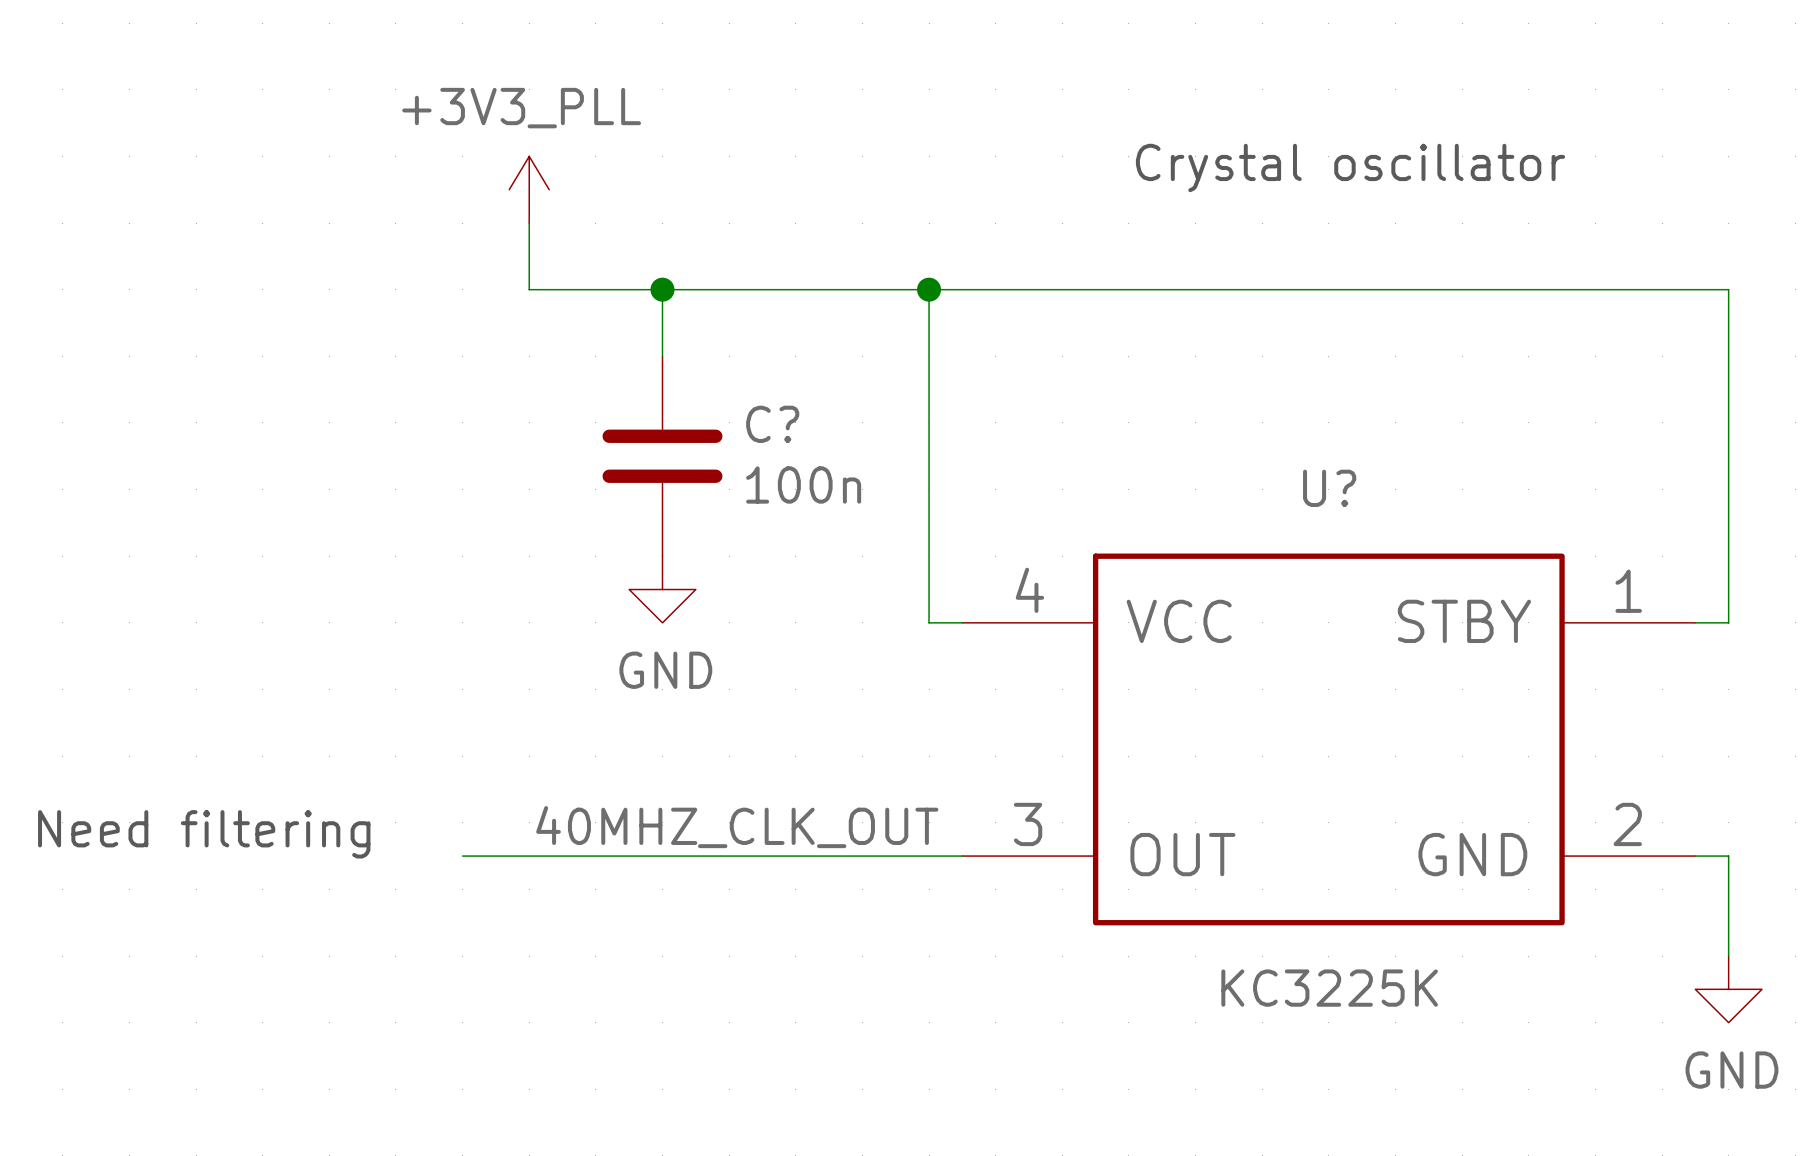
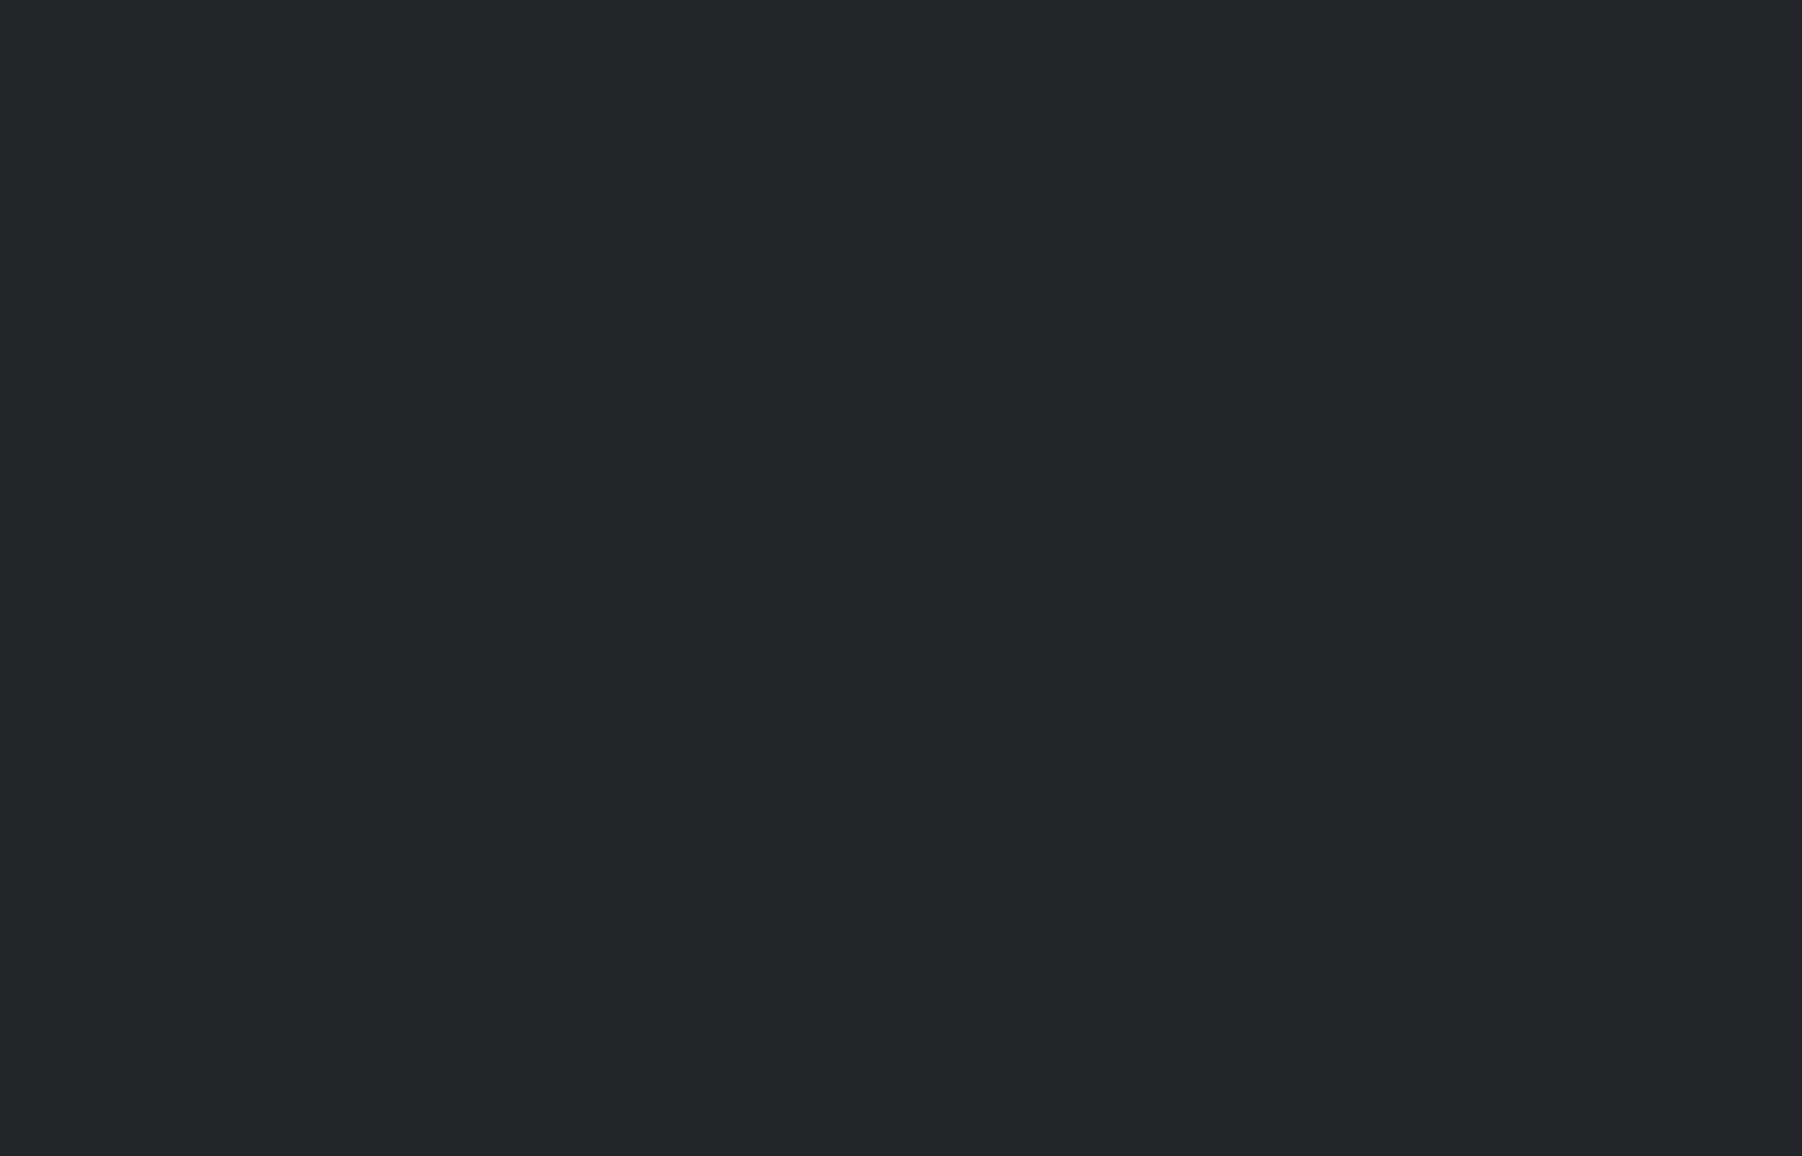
text: Crystal oscillator (1350, 167) -> none
power symbol: +3V3_PLL (529, 189) -> none
wire: (529, 223) (529, 289) (1728, 289) (1728, 622) (1695, 622) -> none
wire: (662, 289) (662, 356) -> none
junction: (662, 289) -> none
wire: (929, 289) (929, 622) (962, 622) -> none
junction: (929, 289) -> none
C?: 100n (662, 456) -> none
power symbol: GND (662, 589) -> none
U?: KC3225K (1328, 739) -> none
label: 40MHZ_CLK_OUT (737, 827) -> none
text: Need filtering (204, 834) -> none
wire: (462, 856) (962, 856) -> none
wire: (1695, 856) (1728, 856) (1728, 956) -> none
power symbol: GND (1728, 989) -> none

